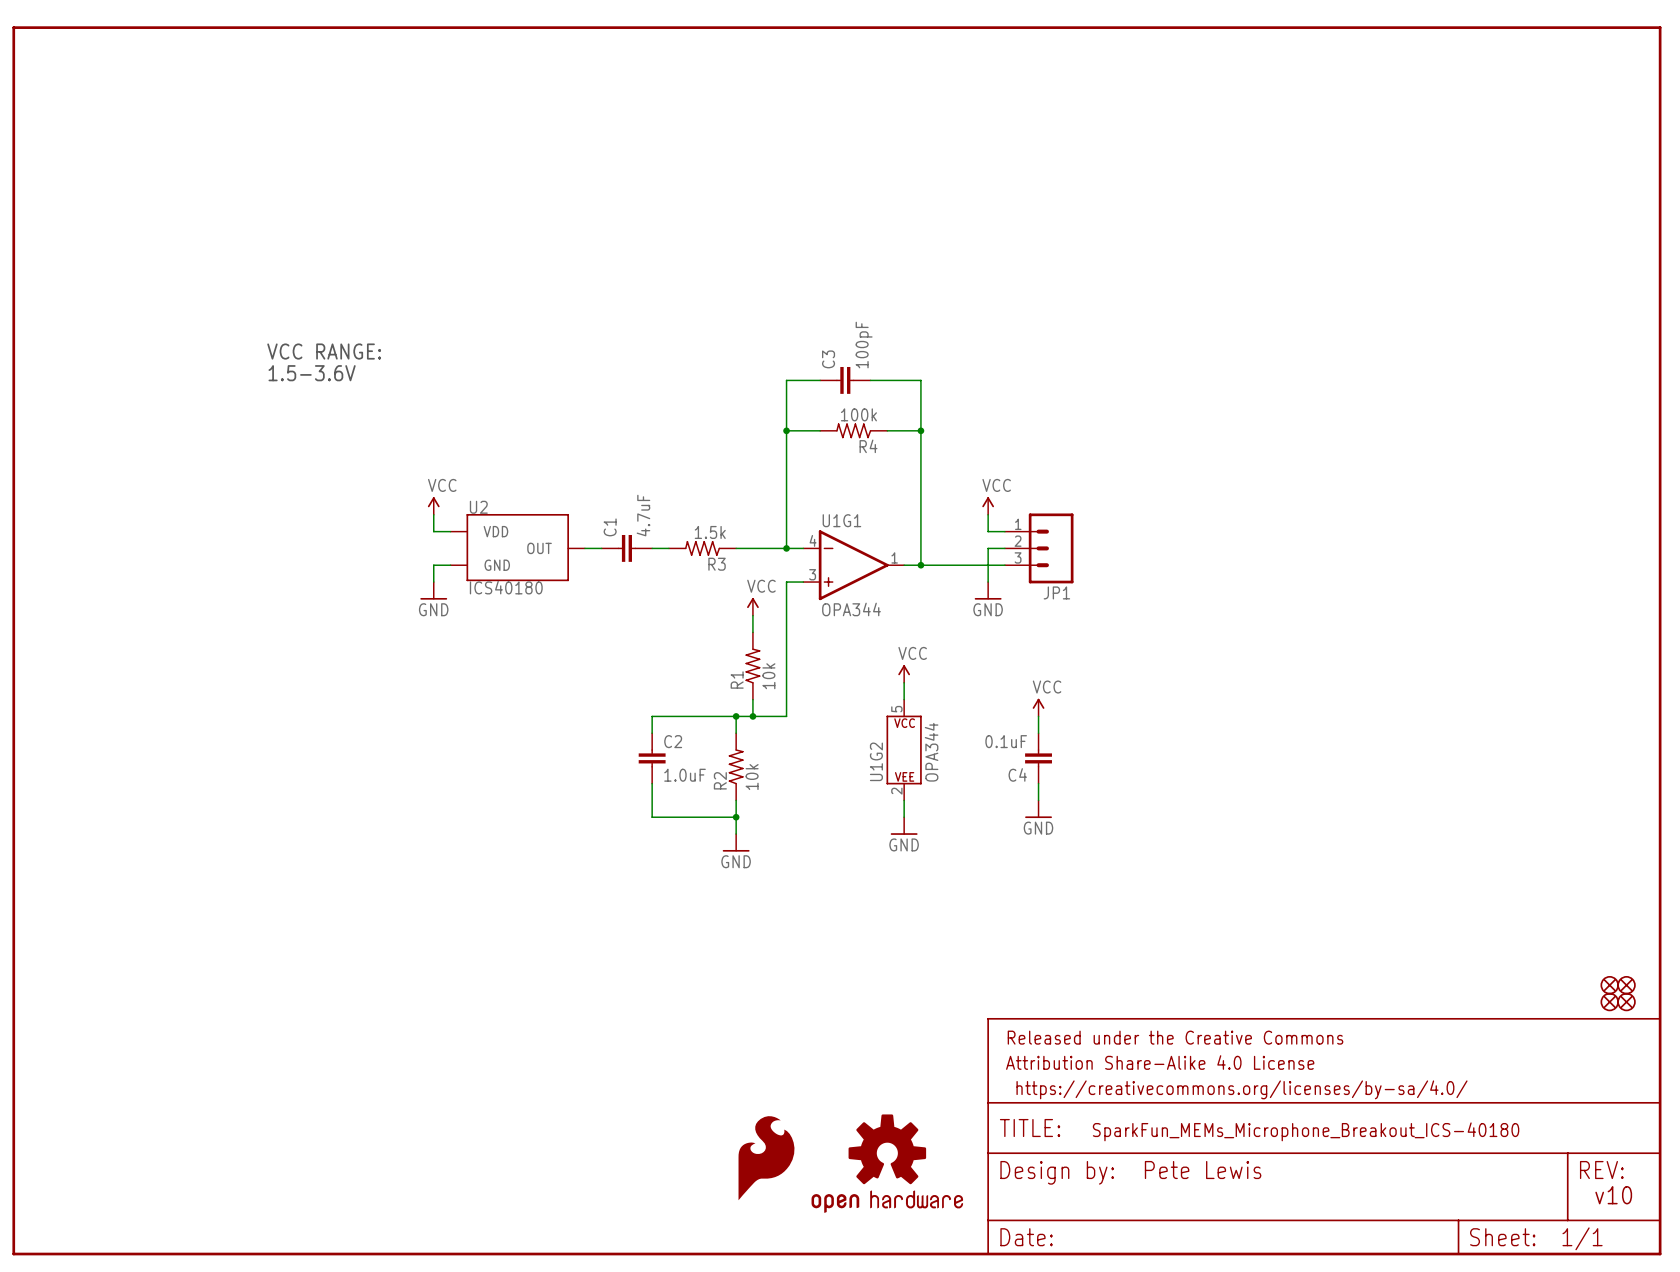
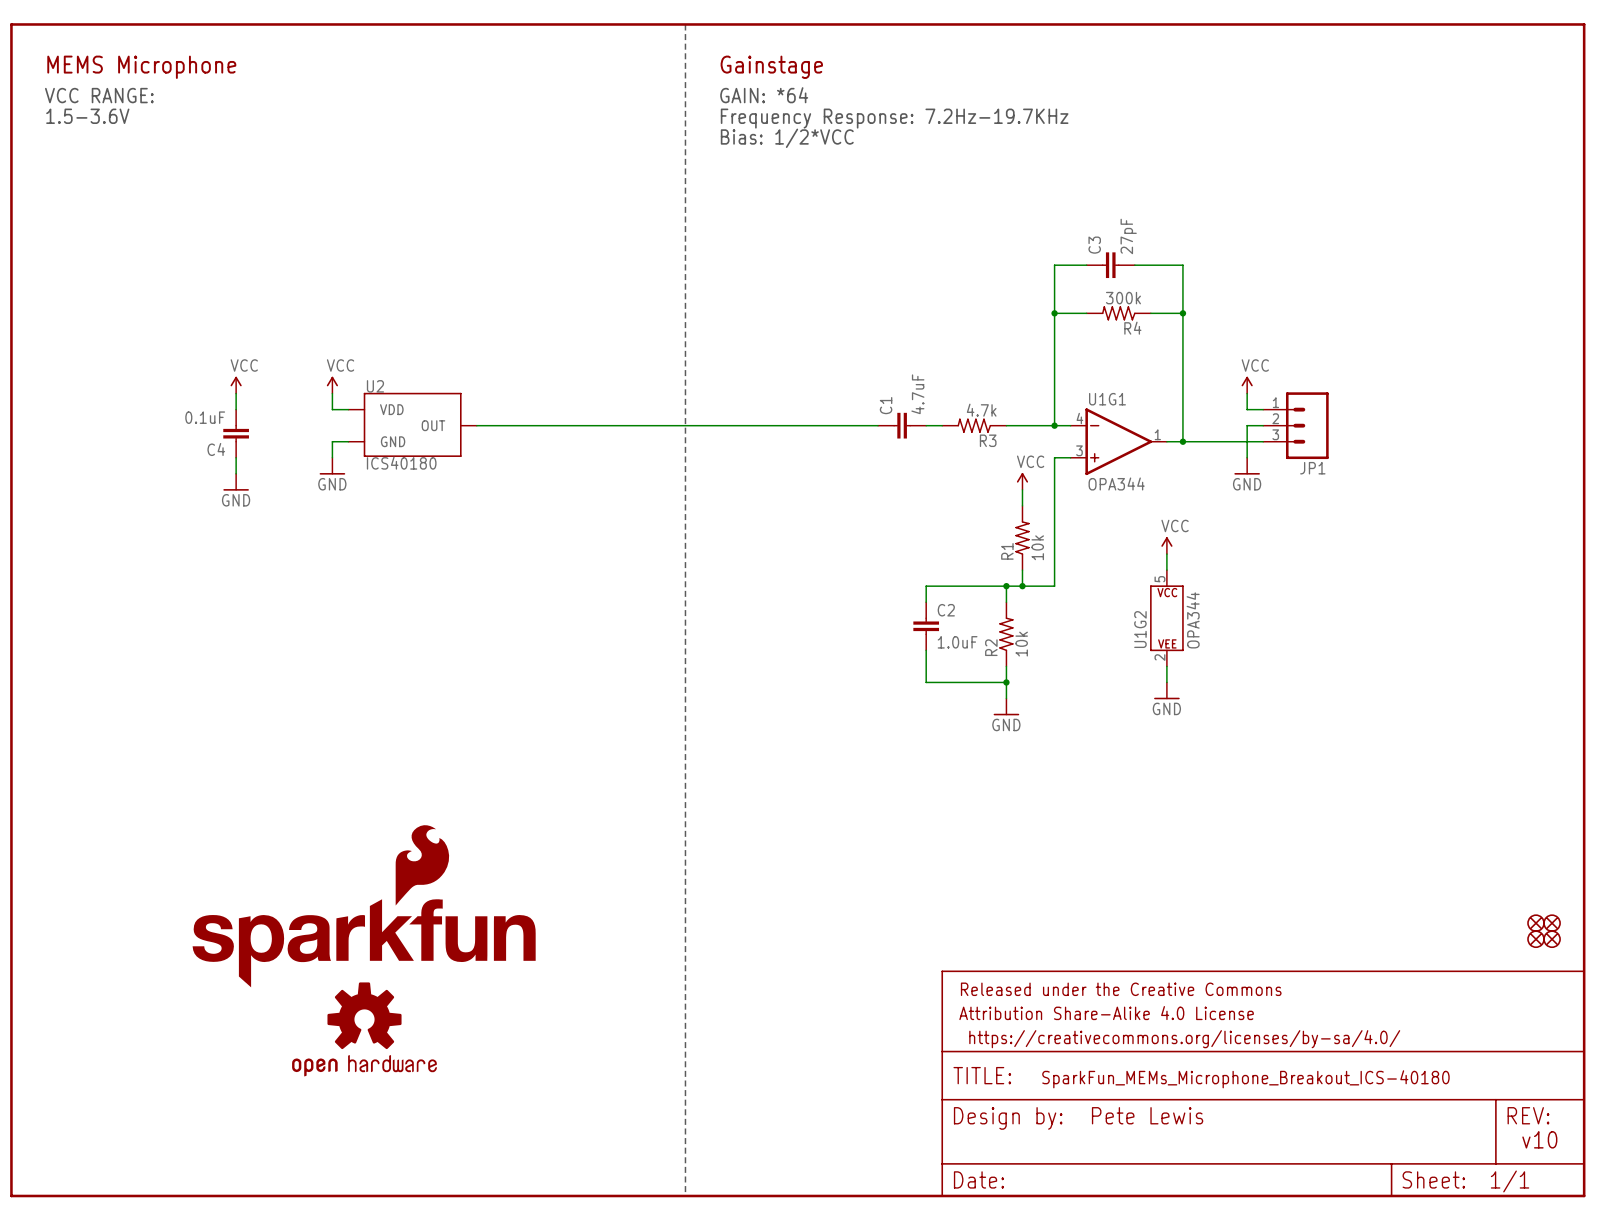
line: none -> (685, 24) (685, 1195)
text: none -> MEMS Microphone (141, 67)
text: none -> Gainstage (771, 67)
text: none -> GAIN: *64 (764, 95)
text: none -> VCC RANGE: (99, 95)
text: none -> 1.5-3.6V (87, 116)
text: none -> Frequency Response: 7.2Hz-19.7KHz (894, 118)
text: none -> Bias: 1/2*VCC (787, 138)
wire: none -> (1086, 265) (1054, 265) (1054, 425)
wire: none -> (1134, 265) (1182, 265) (1182, 441)
wire: none -> (1054, 313) (1086, 313)
junction: none -> (1054, 313)
wire: none -> (1150, 313) (1182, 313)
junction: none -> (1182, 313)
C3 value: 100pF (864, 345) -> 27pF (1128, 236)
text: VCC RANGE: (324, 351) -> none
text: 1.5-3.6V (312, 373) -> none
wire: (820, 380) (786, 380) (786, 548) -> none
C3 position: (845, 380) -> (1110, 265)
wire: (870, 380) (920, 380) (920, 565) -> none
power symbol: none -> VCC (236, 385)
power symbol: none -> VCC (332, 385)
power symbol: none -> VCC (1247, 385)
wire: none -> (236, 393) (236, 409)
R4 value: 100k (858, 414) -> 300k (1123, 298)
wire: none -> (1247, 393) (1247, 409) (1263, 409)
wire: (786, 430) (820, 430) -> none
junction: (786, 430) -> none
R4 position: (853, 430) -> (1118, 313)
wire: (887, 430) (920, 430) -> none
junction: (920, 430) -> none
wire: none -> (476, 425) (878, 425)
wire: none -> (926, 425) (942, 425)
wire: none -> (1006, 425) (1070, 425)
junction: none -> (1054, 425)
wire: none -> (1263, 425) (1247, 425) (1247, 457)
wire: none -> (1166, 441) (1263, 441)
junction: none -> (1182, 441)
wire: none -> (236, 457) (236, 473)
wire: none -> (1070, 457) (1054, 457) (1054, 586) (926, 586) (926, 602)
power symbol: none -> GND (332, 466)
power symbol: none -> GND (1247, 466)
power symbol: none -> GND (236, 482)
power symbol: VCC (433, 506) -> none
power symbol position: VCC (988, 506) -> VCC (1022, 481)
wire: (433, 514) (433, 531) (450, 531) -> (332, 393) (332, 409) (348, 409)
wire: (988, 514) (988, 531) (1004, 531) -> none
R3 value: 1.5k (710, 532) -> 4.7k (981, 410)
U2 position: (517, 547) -> (412, 424)
wire: (584, 548) (601, 548) -> none
C1 position: (626, 548) -> (902, 425)
wire: (652, 548) (668, 548) -> none
R3 position: (702, 548) -> (974, 425)
wire: (736, 548) (803, 548) -> none
junction: (786, 548) -> none
wire: (1004, 548) (988, 548) (988, 582) -> none
JP1 position: (1039, 548) -> (1295, 425)
wire: (450, 565) (433, 565) (433, 582) -> (348, 441) (332, 441) (332, 457)
U1G1 position: (853, 565) -> (1118, 441)
wire: (904, 565) (1004, 565) -> none
junction: (920, 565) -> none
power symbol: none -> VCC (1166, 545)
wire: (803, 582) (786, 582) (786, 716) (652, 716) (652, 733) -> none
wire: none -> (1166, 554) (1166, 570)
power symbol: GND (433, 590) -> none
power symbol: GND (988, 590) -> none
wire: none -> (1022, 570) (1022, 586)
power symbol: VCC (752, 606) -> none
wire: (752, 615) (752, 632) -> none
junction: none -> (1006, 586)
junction: none -> (1022, 586)
R1 position: (752, 666) -> (1022, 538)
power symbol: VCC (904, 674) -> none
wire: (904, 682) (904, 699) -> none
wire: none -> (926, 650) (926, 682) (1006, 682)
wire: (752, 699) (752, 716) -> none
wire: none -> (1006, 666) (1006, 698)
wire: none -> (1166, 666) (1166, 682)
power symbol: VCC (1038, 707) -> none
wire: (736, 716) (736, 733) -> none
junction: (736, 716) -> none
junction: (752, 716) -> none
wire: (1038, 716) (1038, 733) -> (1006, 586) (1006, 602)
junction: none -> (1006, 682)
power symbol: none -> GND (1166, 690)
U1G2 position: (904, 750) -> (1166, 618)
C2 position: (652, 758) -> (926, 626)
C4 position: (1038, 758) -> (236, 433)
R2 position: (736, 766) -> (1006, 634)
wire: (652, 783) (652, 817) (736, 817) -> none
wire: (1038, 783) (1038, 800) -> none
wire: (736, 800) (736, 834) -> none
wire: (904, 800) (904, 817) -> none
power symbol position: GND (1038, 809) -> GND (1006, 706)
junction: (736, 817) -> none
power symbol: GND (904, 826) -> none
power symbol: GND (736, 842) -> none
part: none -> (422, 865)
drawing: none -> [192, 899, 536, 988]
part: none -> (1536, 923)
part: none -> (1552, 923)
part: (1609, 1002) -> none
part: (1626, 1002) -> none
part: none -> (364, 1029)
part: (766, 1158) -> none
part: (887, 1163) -> none

